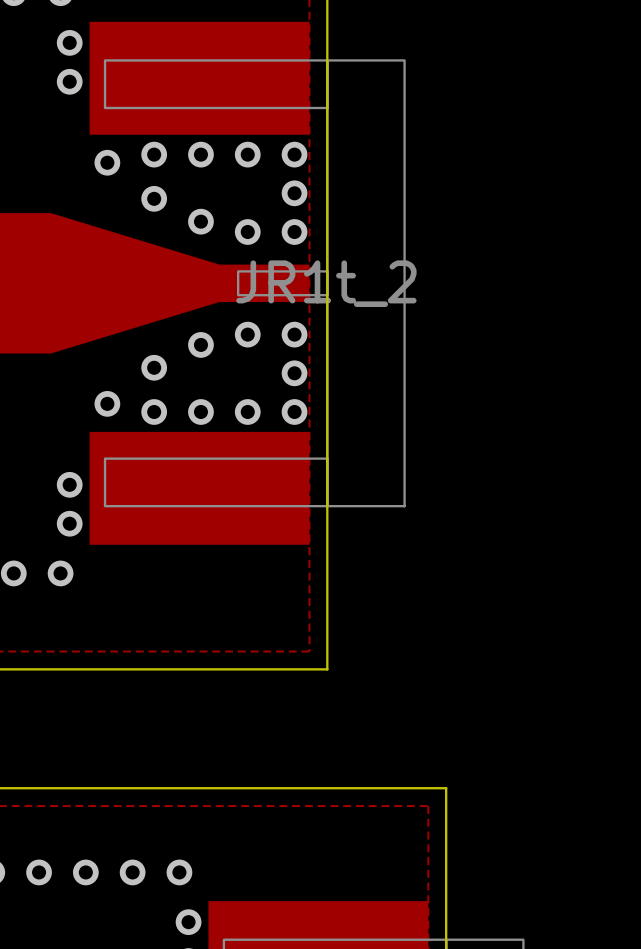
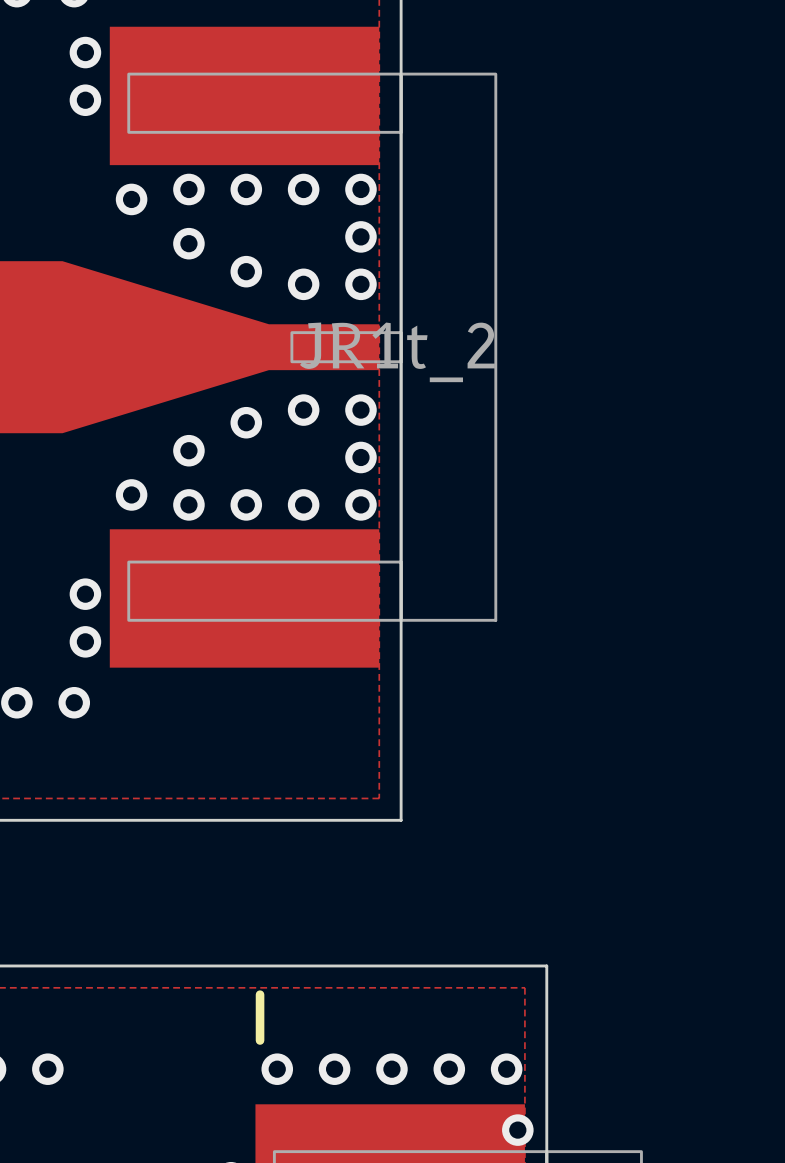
line: none -> (260, 994) (260, 1040)
via: (85, 872) -> none
via: (132, 872) -> none
via: (179, 872) -> none
via: none -> (277, 1069)
via: none -> (334, 1069)
via: none -> (391, 1069)
via: none -> (449, 1069)
via: none -> (506, 1069)
via: (188, 922) -> none
via: none -> (517, 1130)

